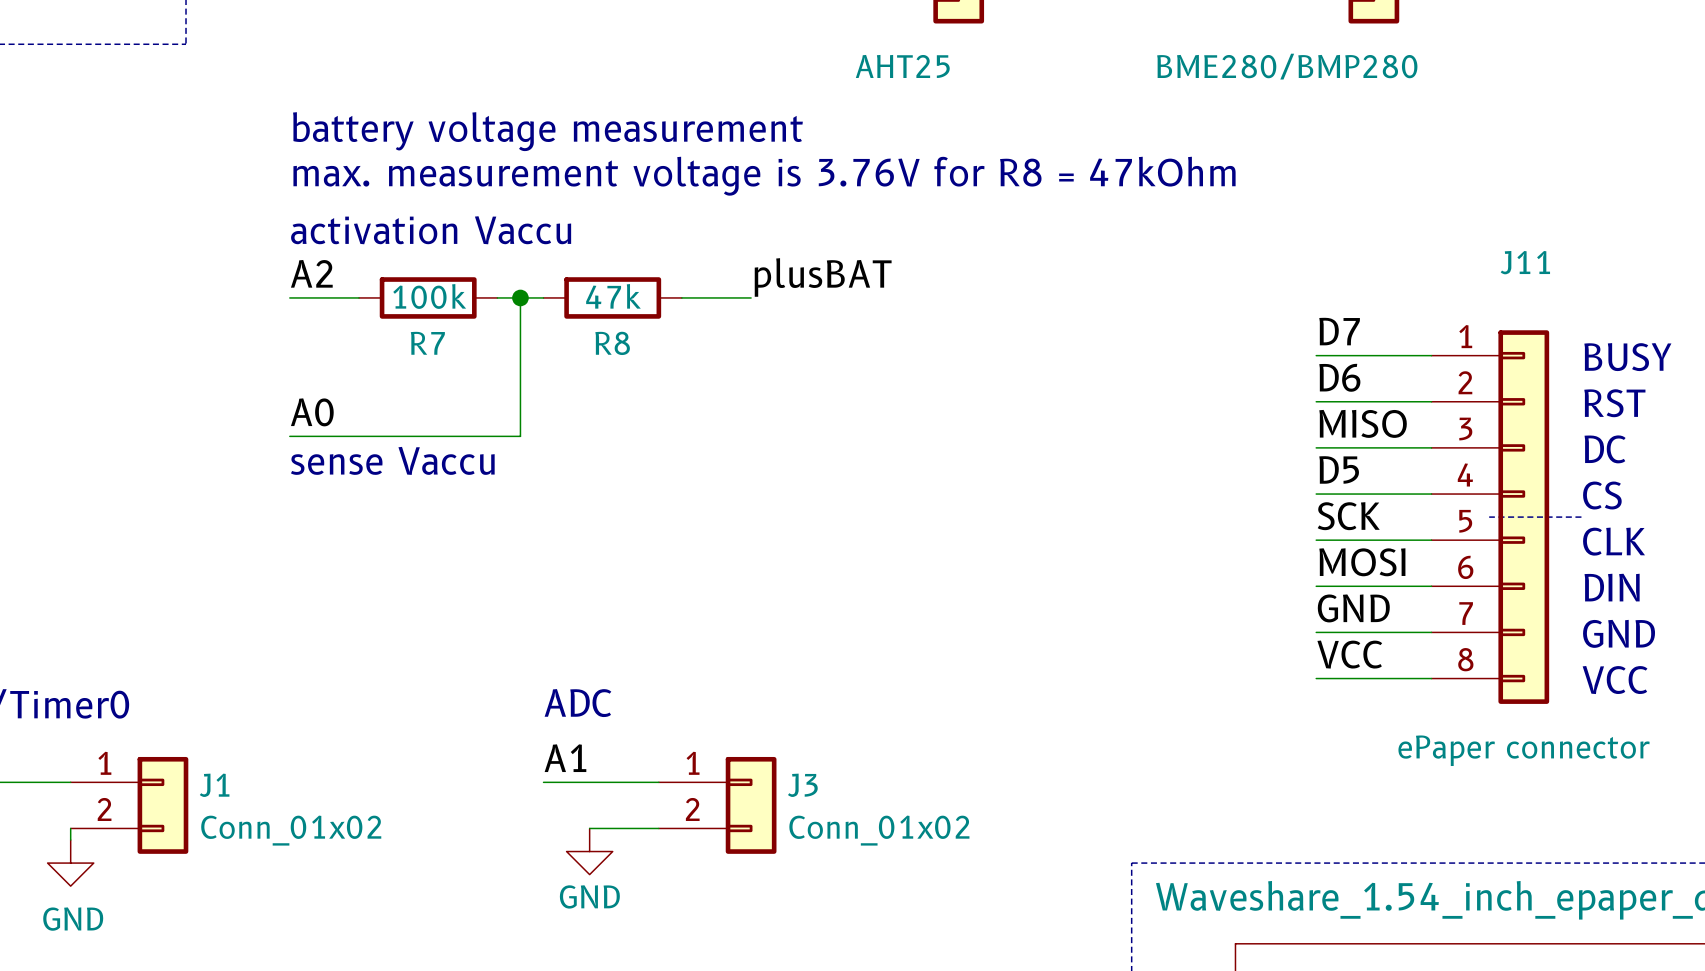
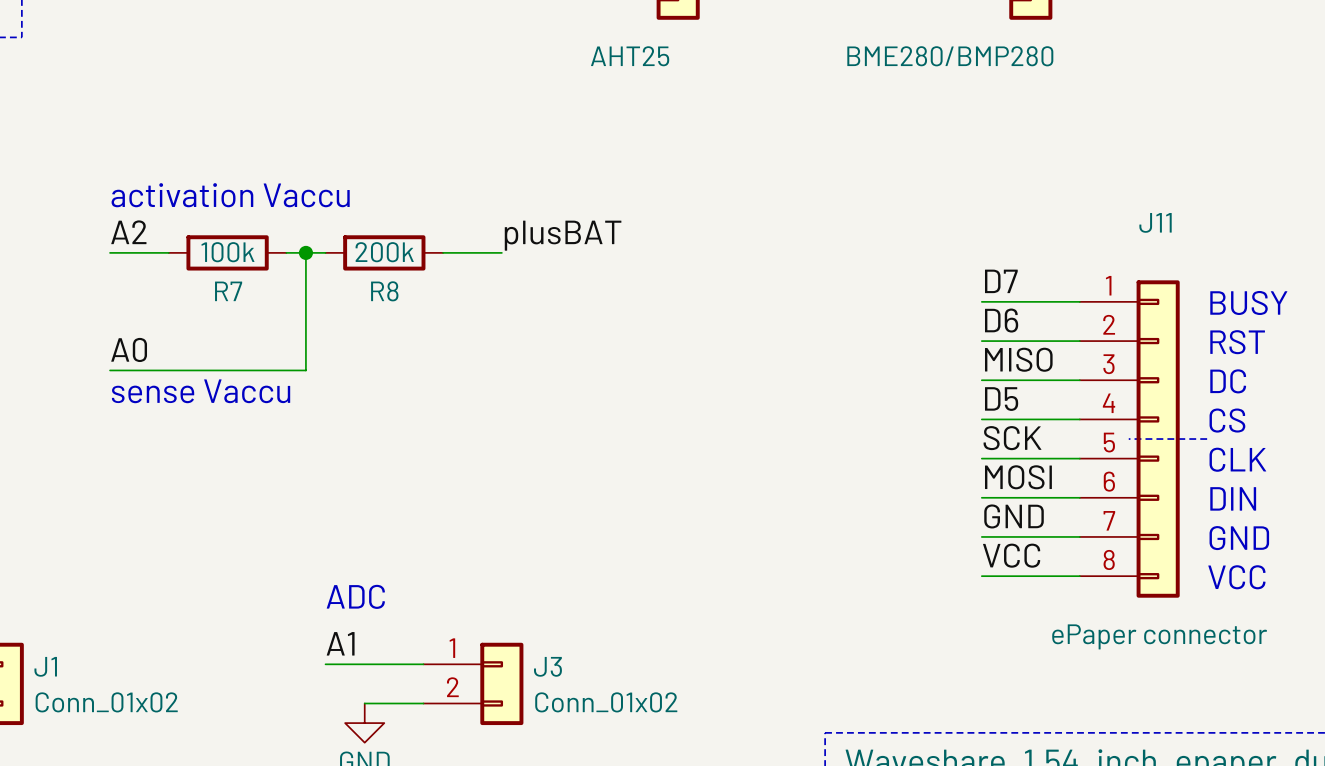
text: battery voltage measurement (547, 131) -> none
text: max. measurement voltage is 3.76V for R8 = 47kOhm (764, 176) -> none
R8 value: 47k (613, 296) -> 200k (384, 252)

